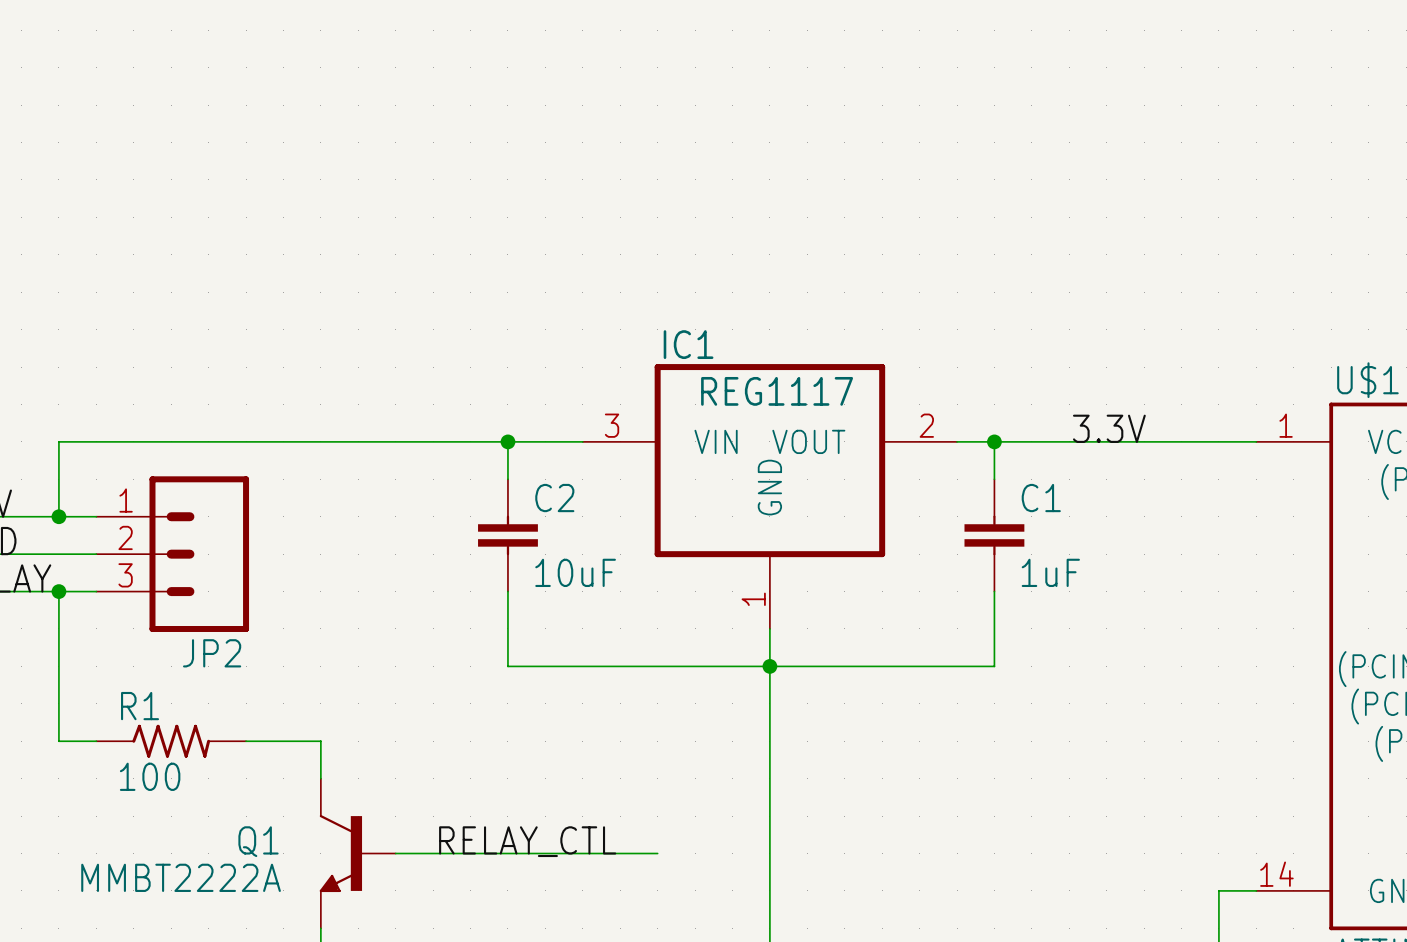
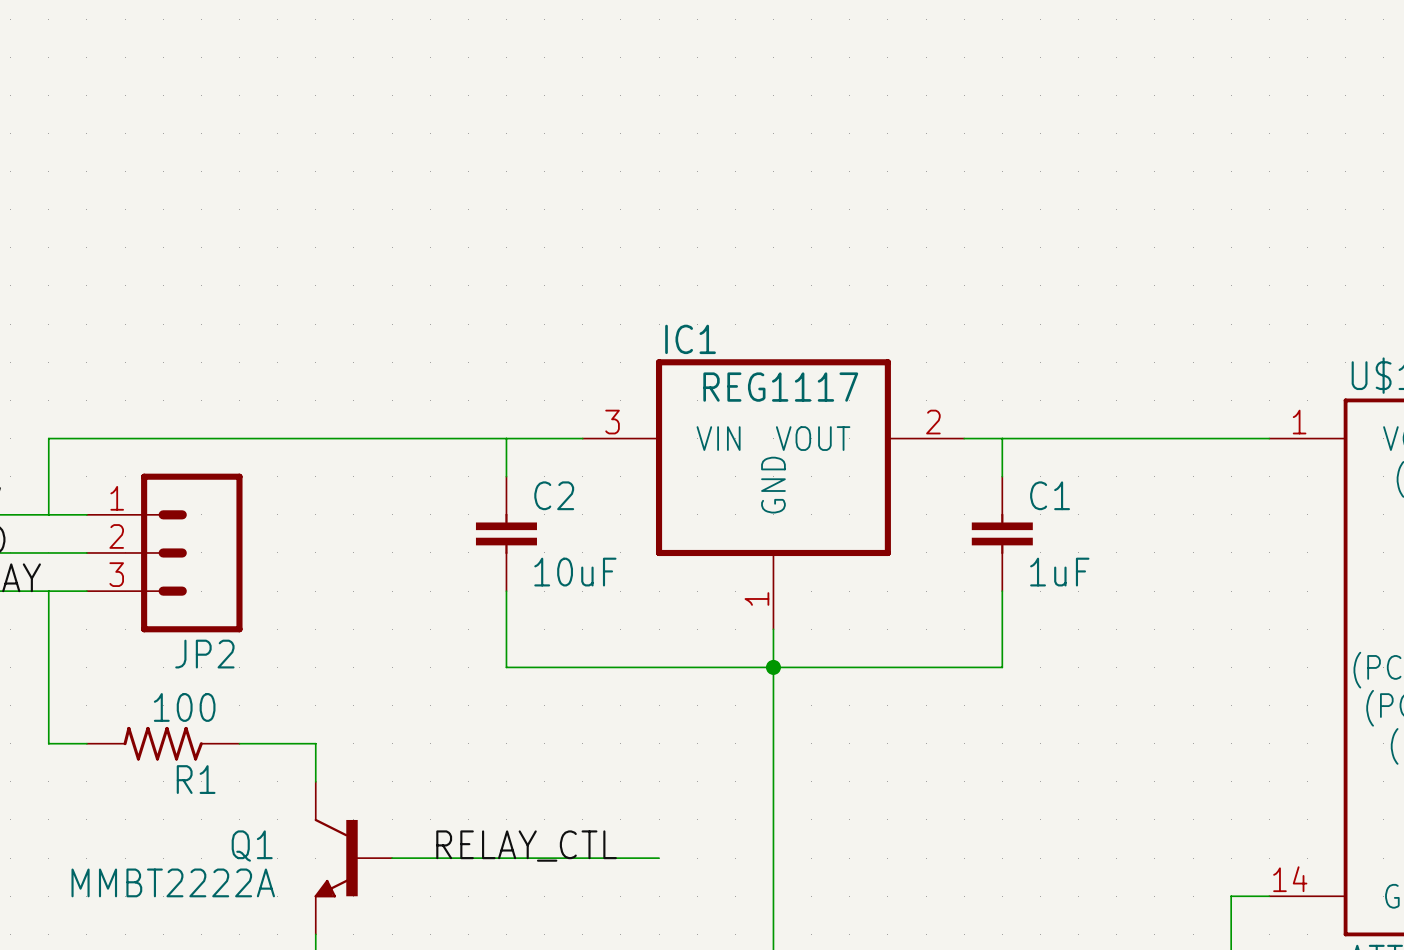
label: 3.3V (1109, 428) -> none
junction: (507, 441) -> none
junction: (994, 441) -> none
junction: (58, 516) -> none
junction: (58, 591) -> none
R1 rotation: 0° (171, 741) -> 180° (163, 743)

